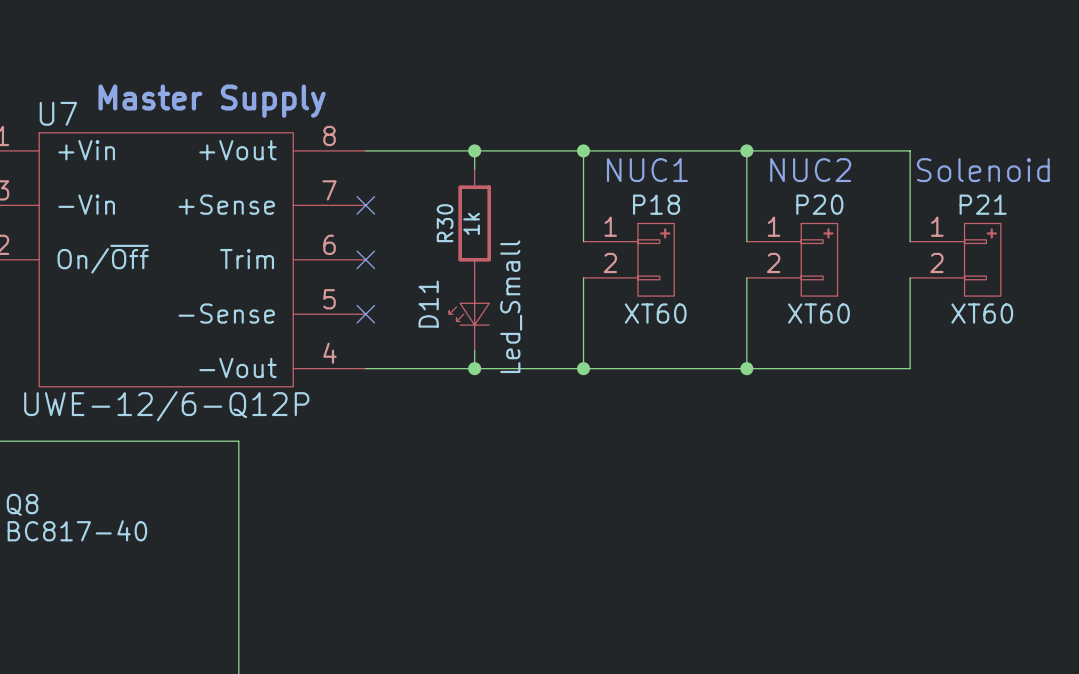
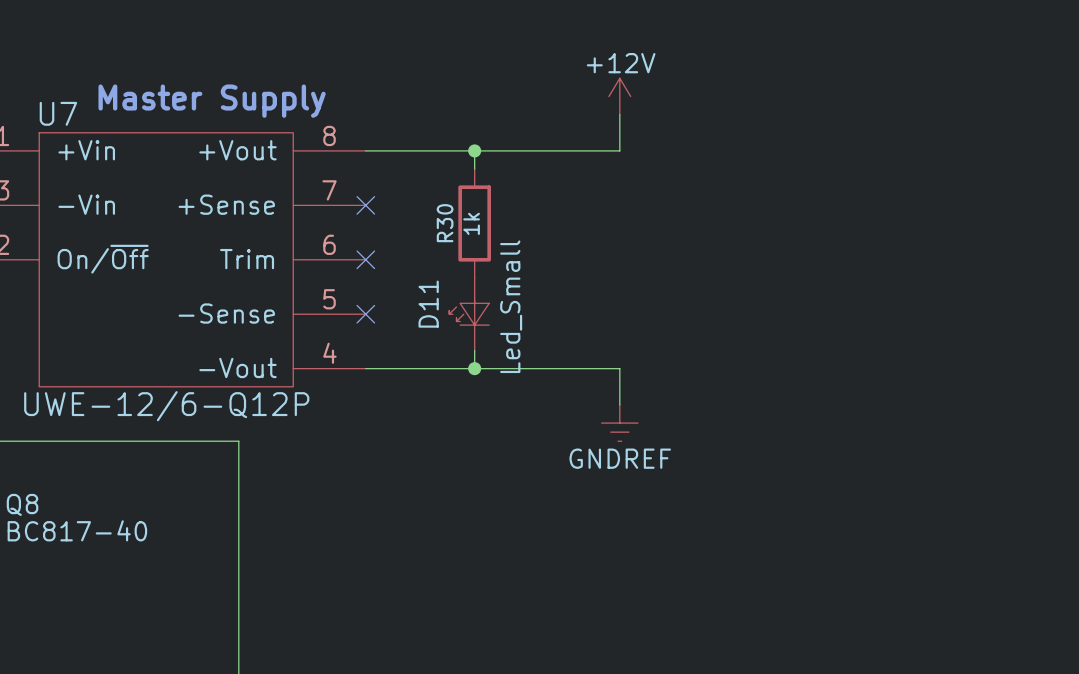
power symbol: none -> +12V (619, 96)
wire: (583, 150) (583, 241) -> none
junction: (583, 150) -> none
wire: (619, 150) (910, 150) (910, 241) -> (619, 150) (619, 114)
wire: (746, 150) (746, 241) -> none
junction: (746, 150) -> none
text: NUC1 (647, 170) -> none
text: NUC2 (810, 170) -> none
text: Solenoid (983, 170) -> none
P18: XT60 (628, 259) -> none
P20: XT60 (792, 259) -> none
P21: XT60 (955, 259) -> none
wire: (583, 277) (583, 368) -> none
wire: (746, 277) (746, 368) -> none
wire: (910, 277) (910, 368) (619, 368) -> (619, 404) (619, 368)
junction: (583, 368) -> none
junction: (746, 368) -> none
power symbol: none -> GNDREF (619, 423)

